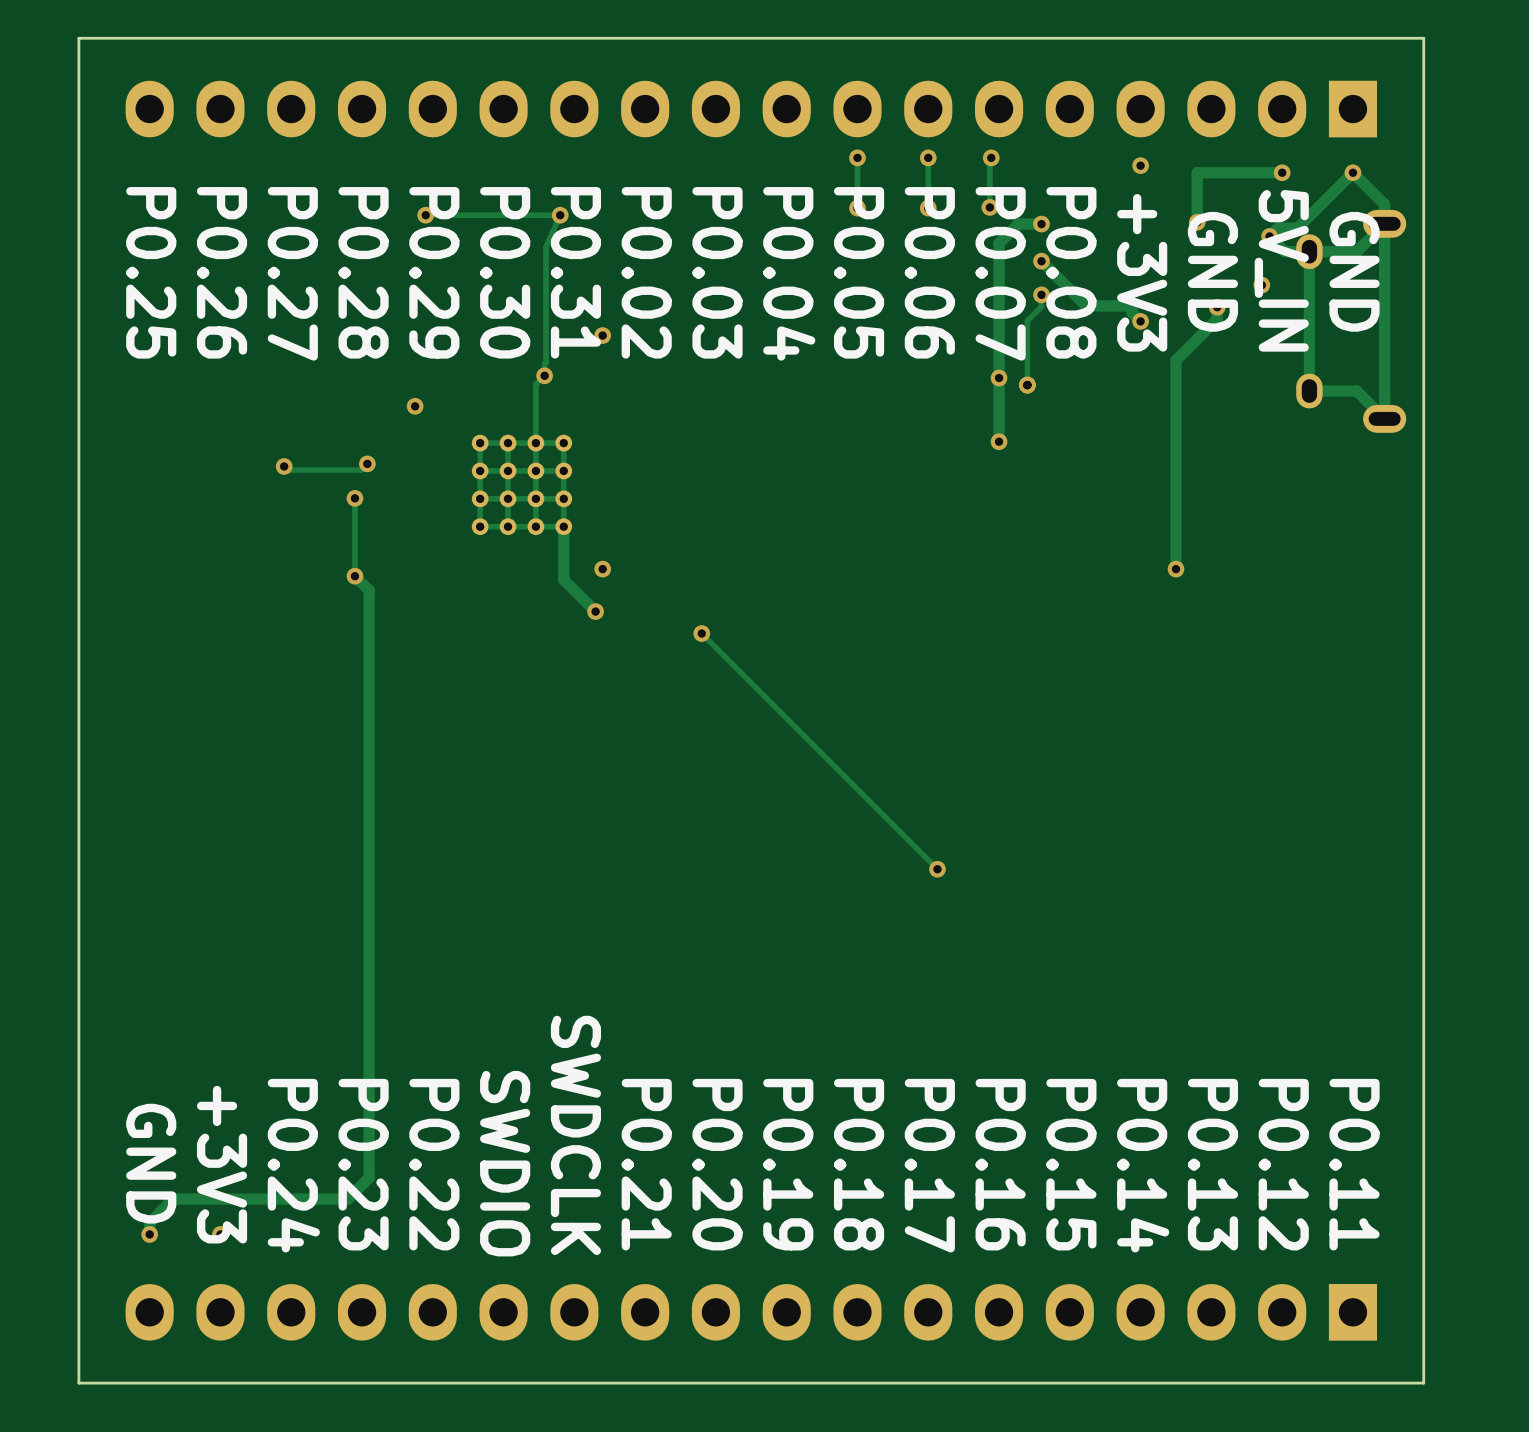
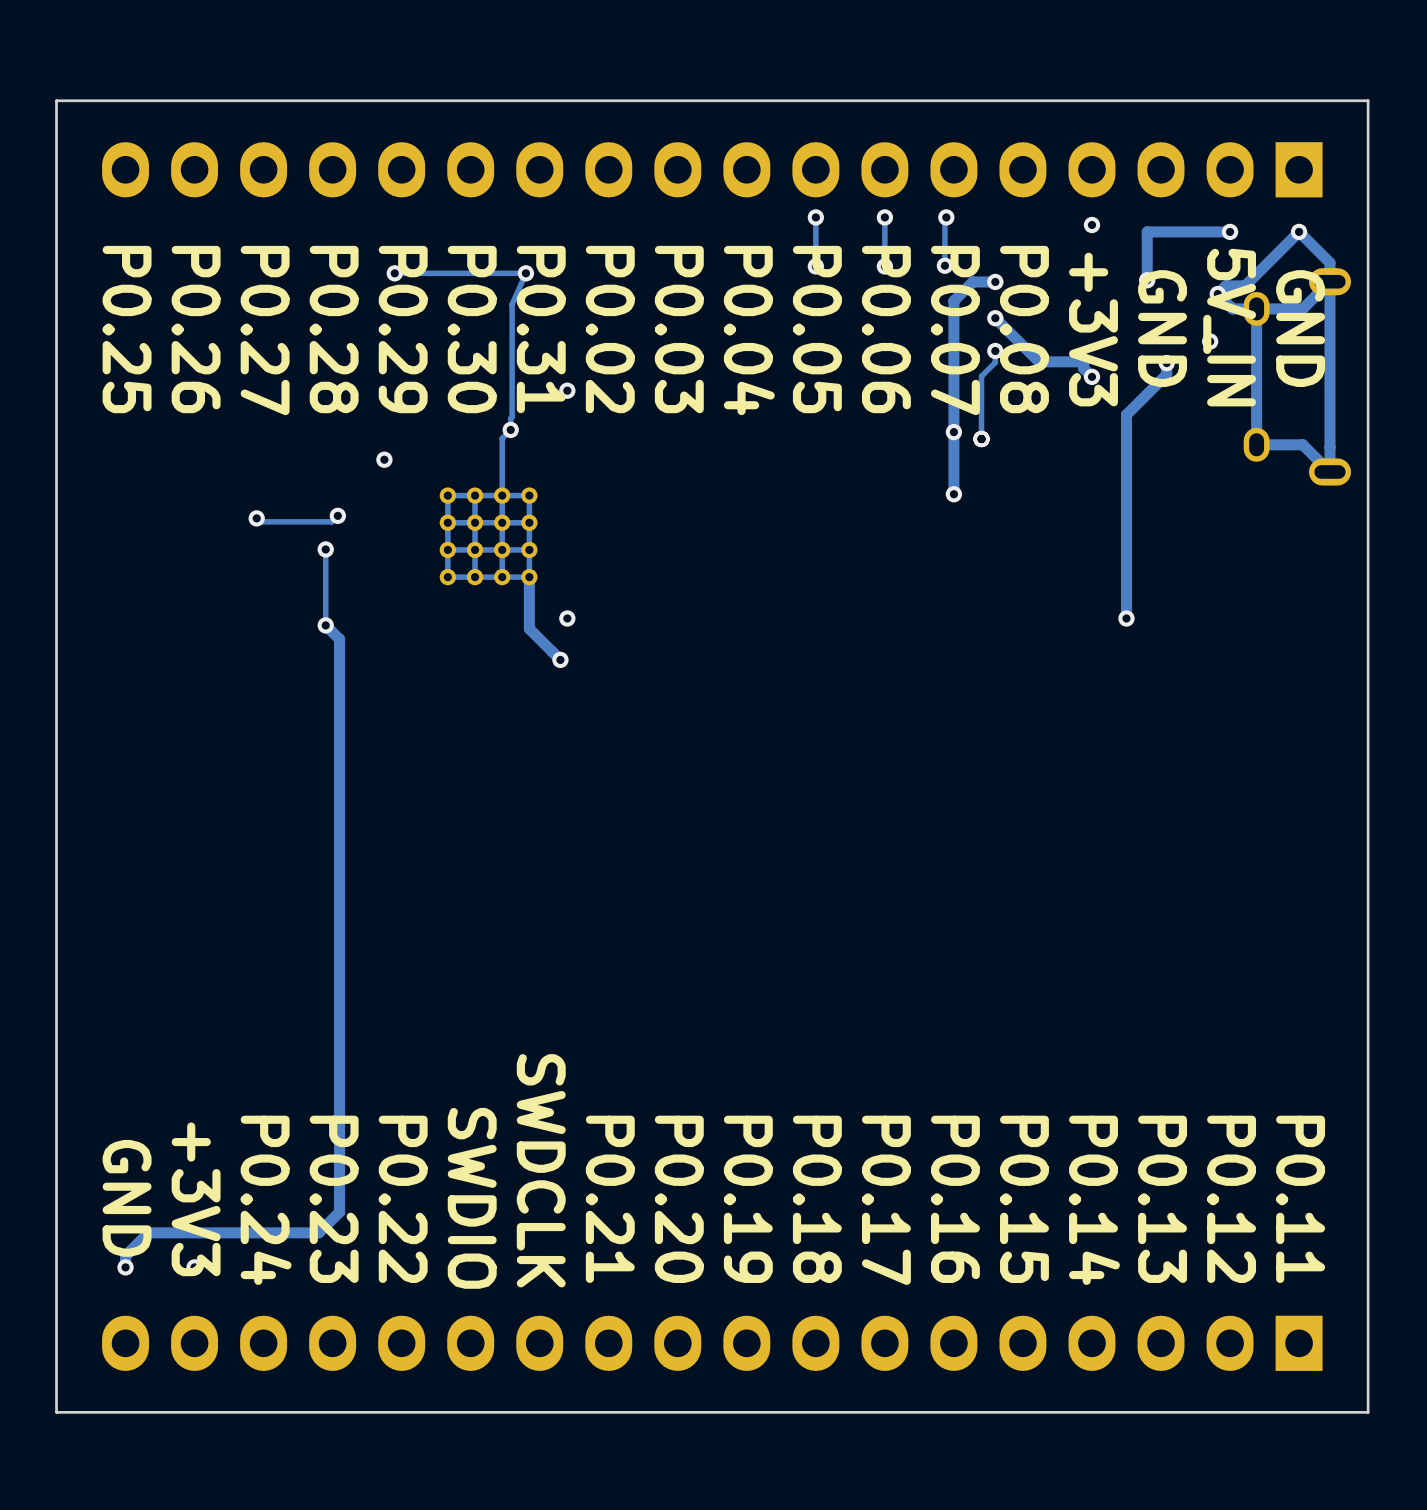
track: (701, 633) (937, 869) -> none
via: (701, 633) -> none
via: (937, 869) -> none

